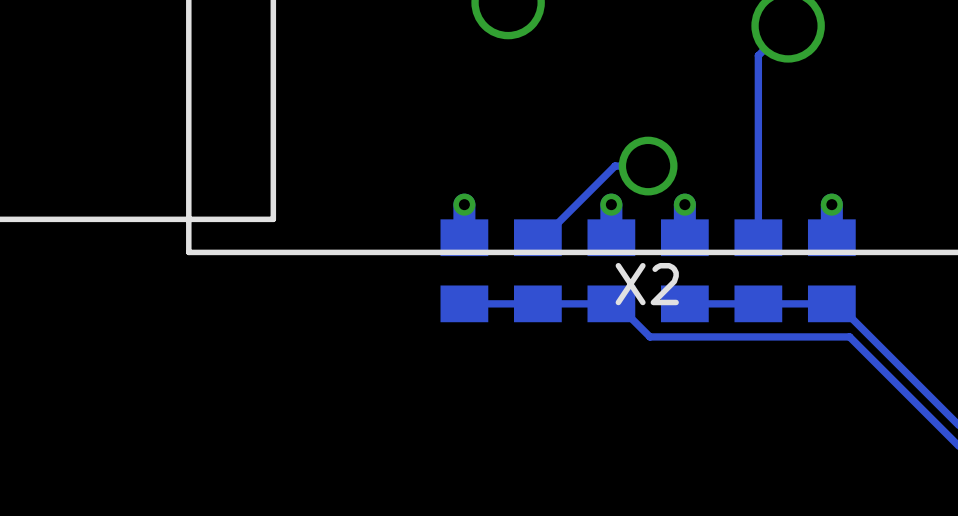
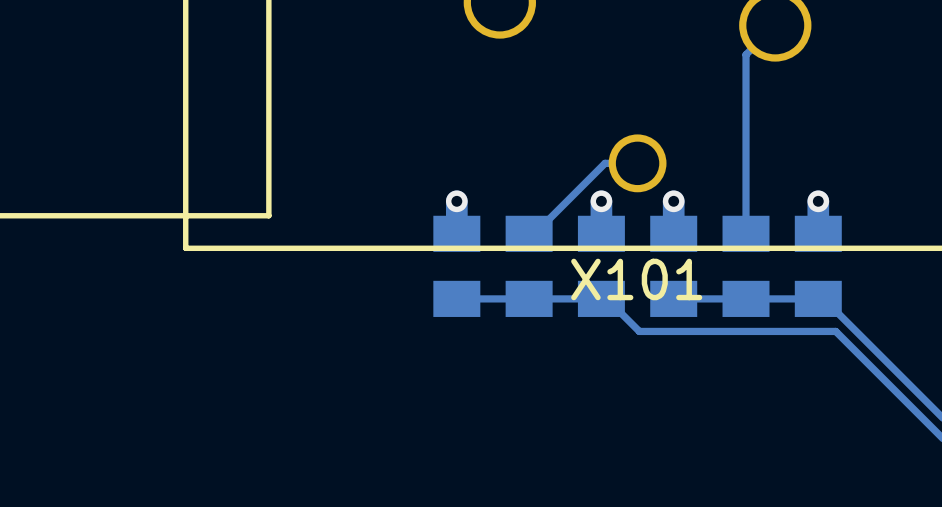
X2 name: X2 (647, 284) -> X101 (636, 279)

